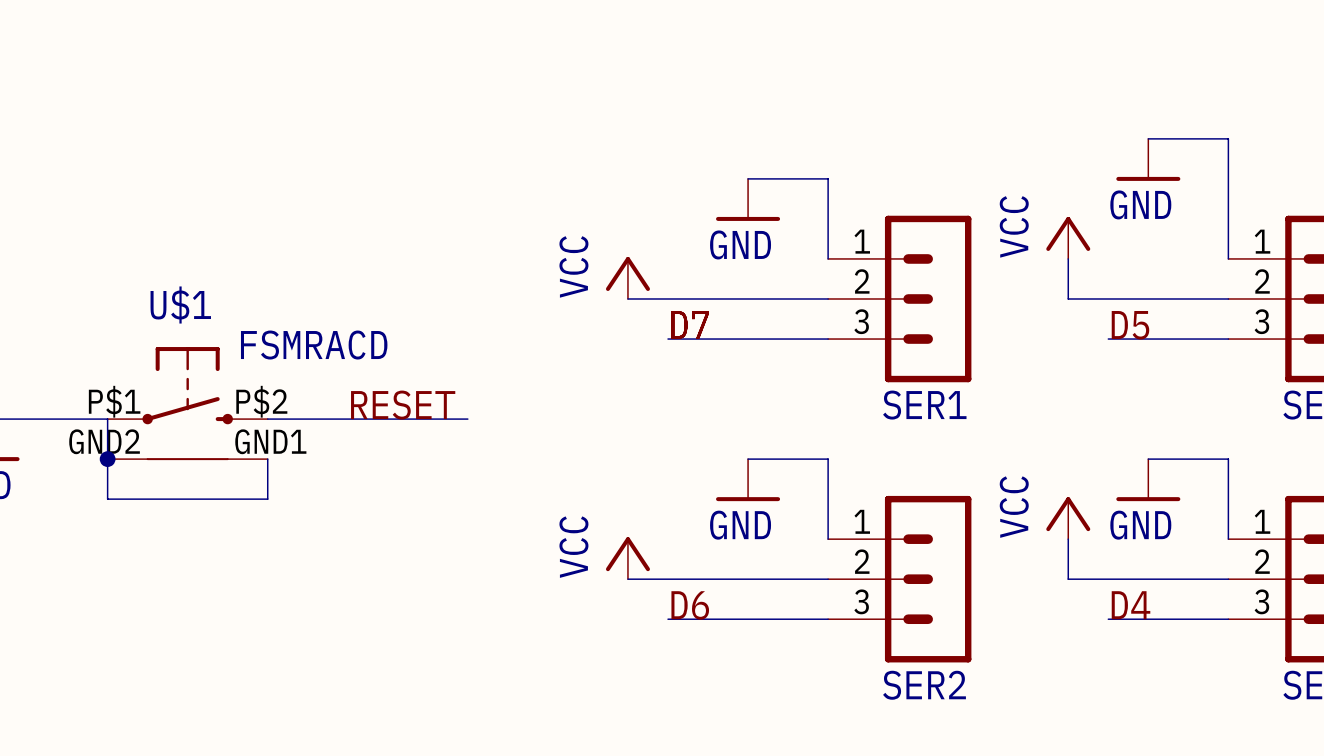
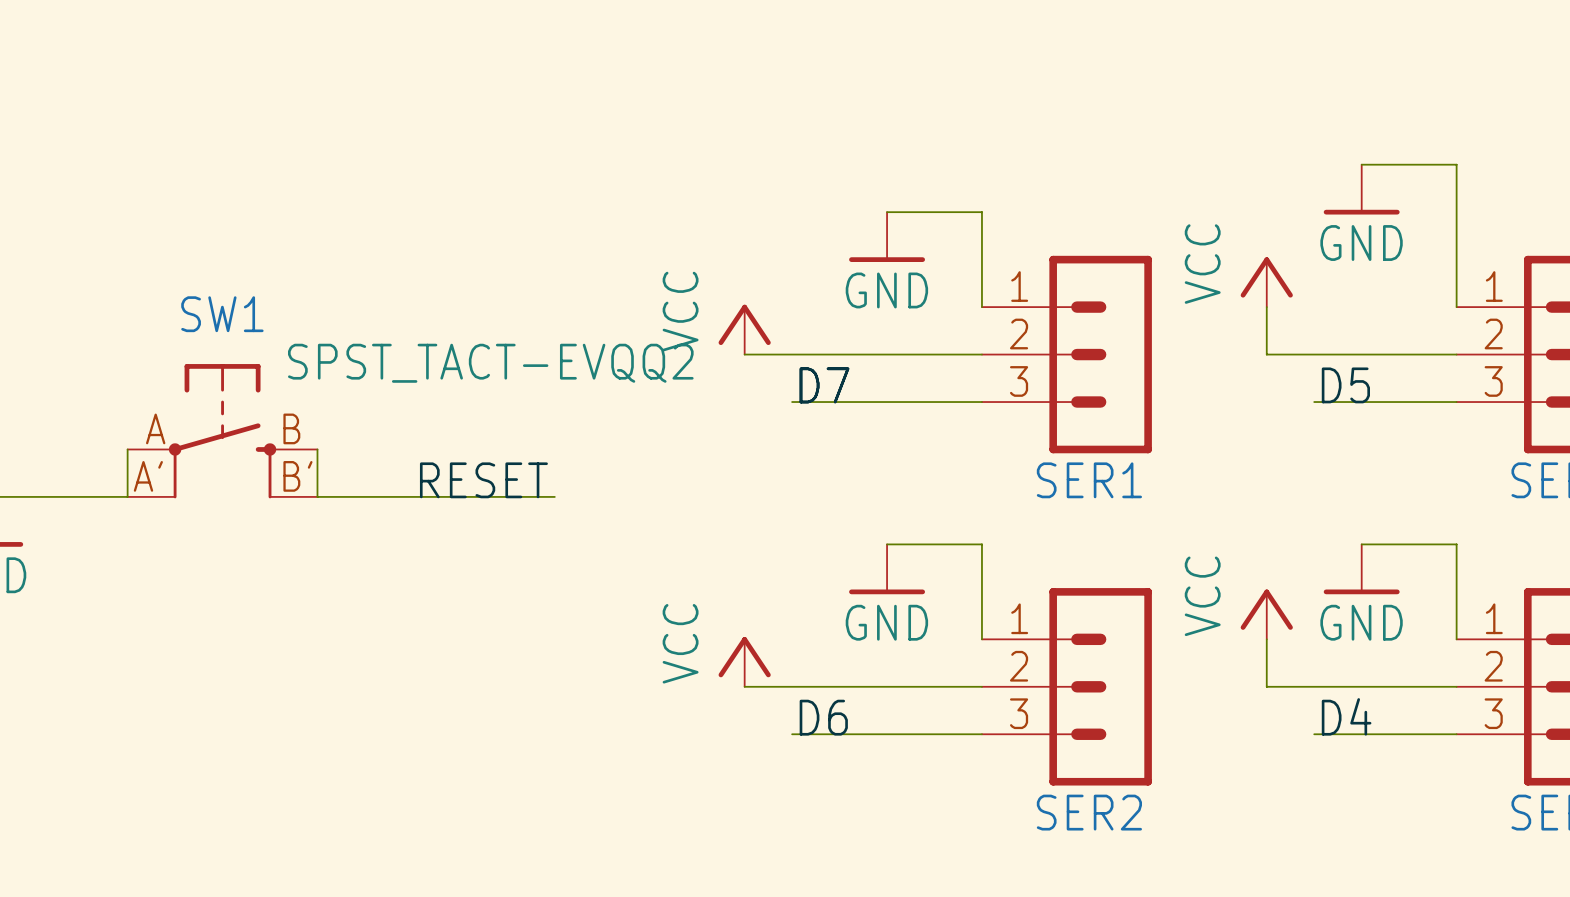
SW1: none -> SPST_TACT-EVQQ2 (222, 431)
wire: none -> (317, 449) (317, 496)
U$1: FSMRACD (187, 403) -> none
wire: (107, 419) (107, 499) (267, 499) (267, 459) -> (127, 496) (127, 449)
junction: (107, 459) -> none

